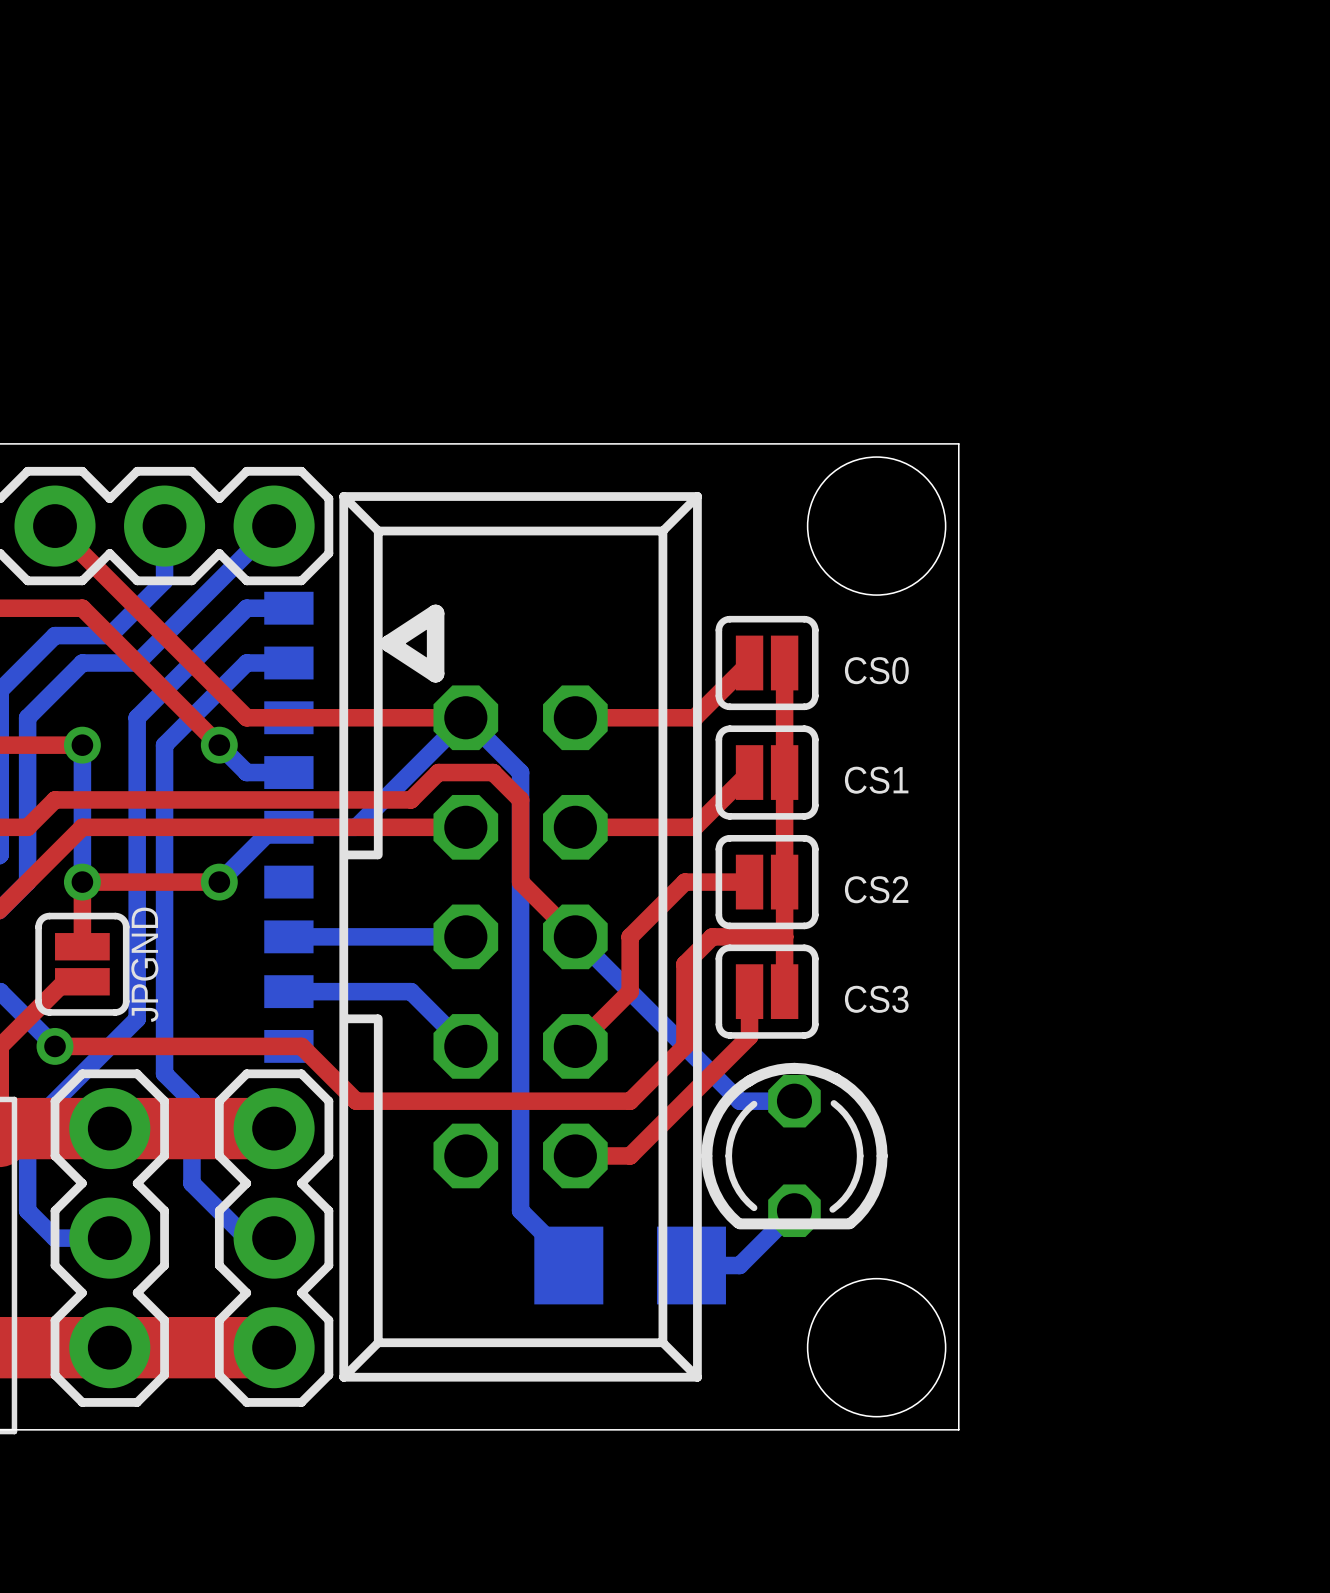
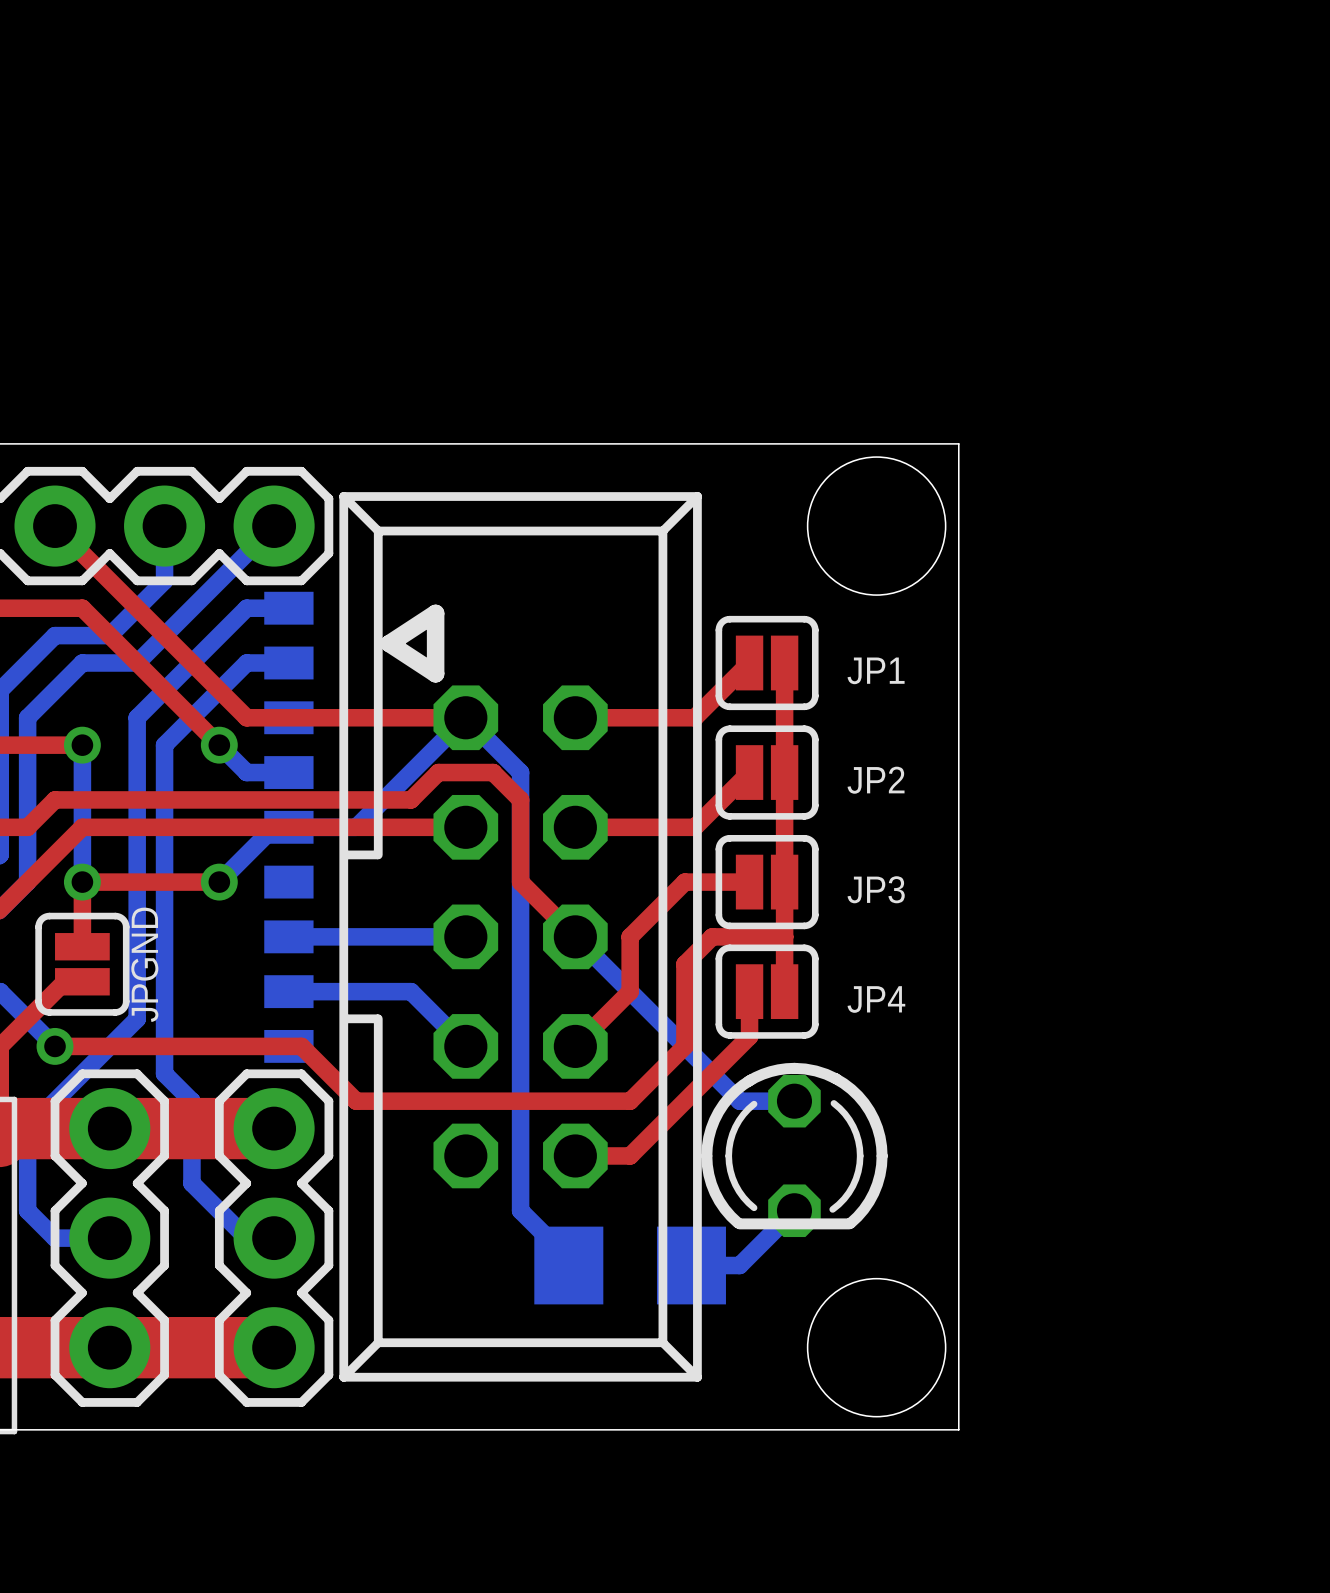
CS0 name: CS0 (876, 670) -> JP1 (876, 670)
CS1 name: CS1 (876, 780) -> JP2 (876, 780)
CS2 name: CS2 (876, 889) -> JP3 (876, 889)
CS3 name: CS3 (876, 999) -> JP4 (876, 999)

